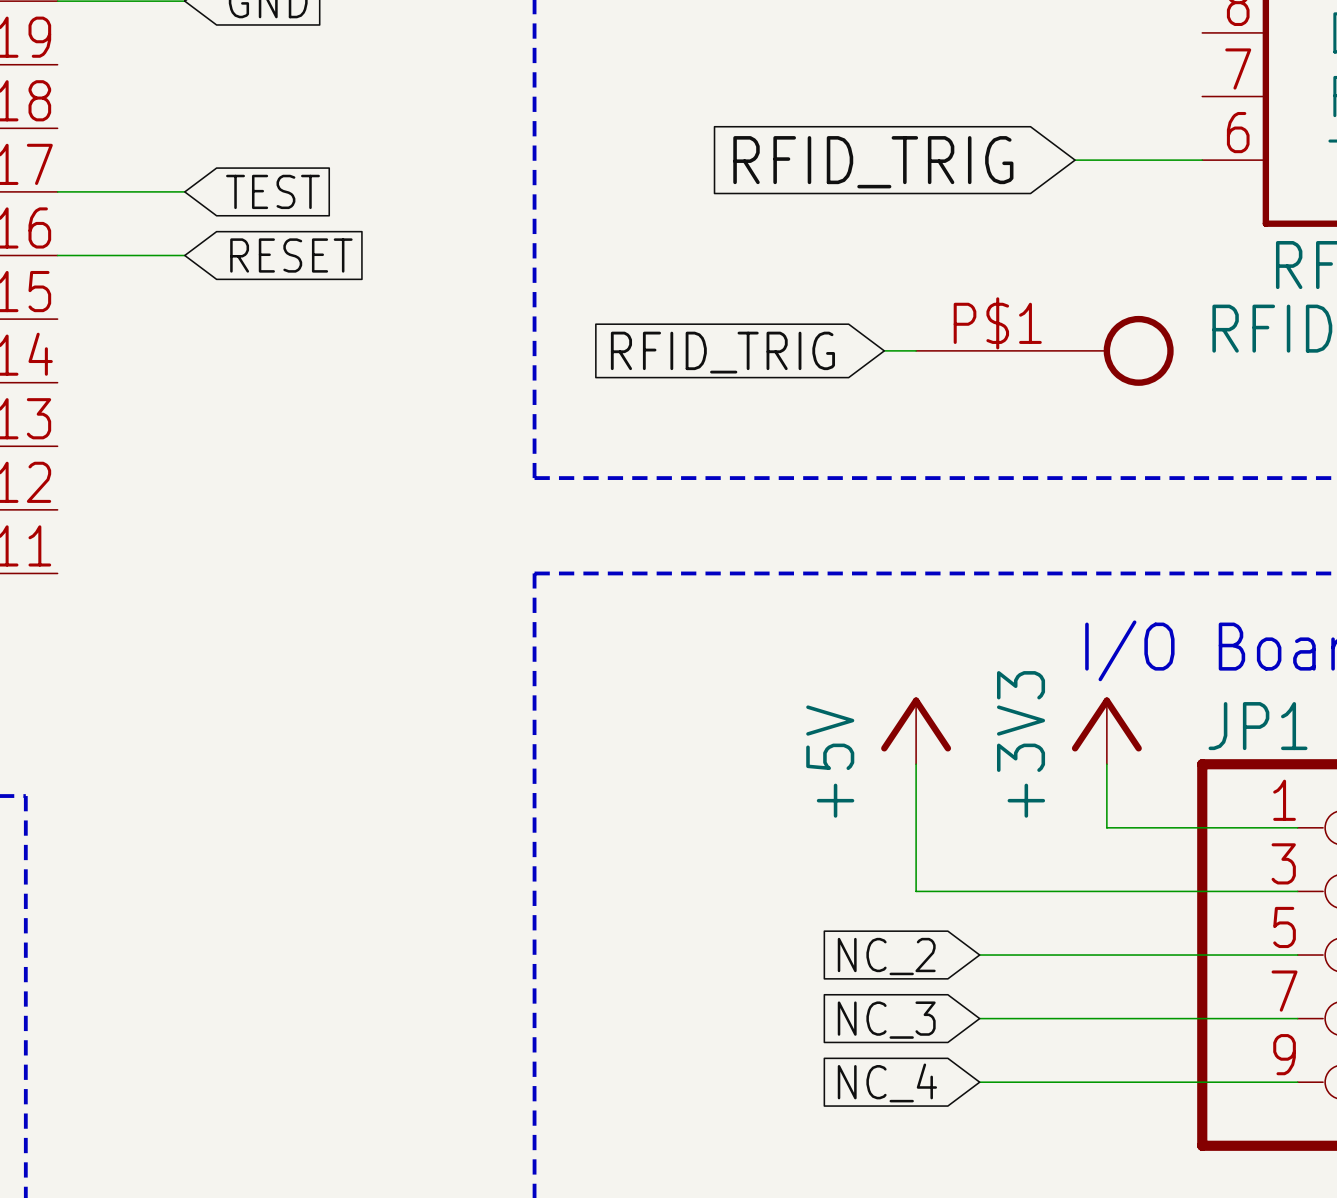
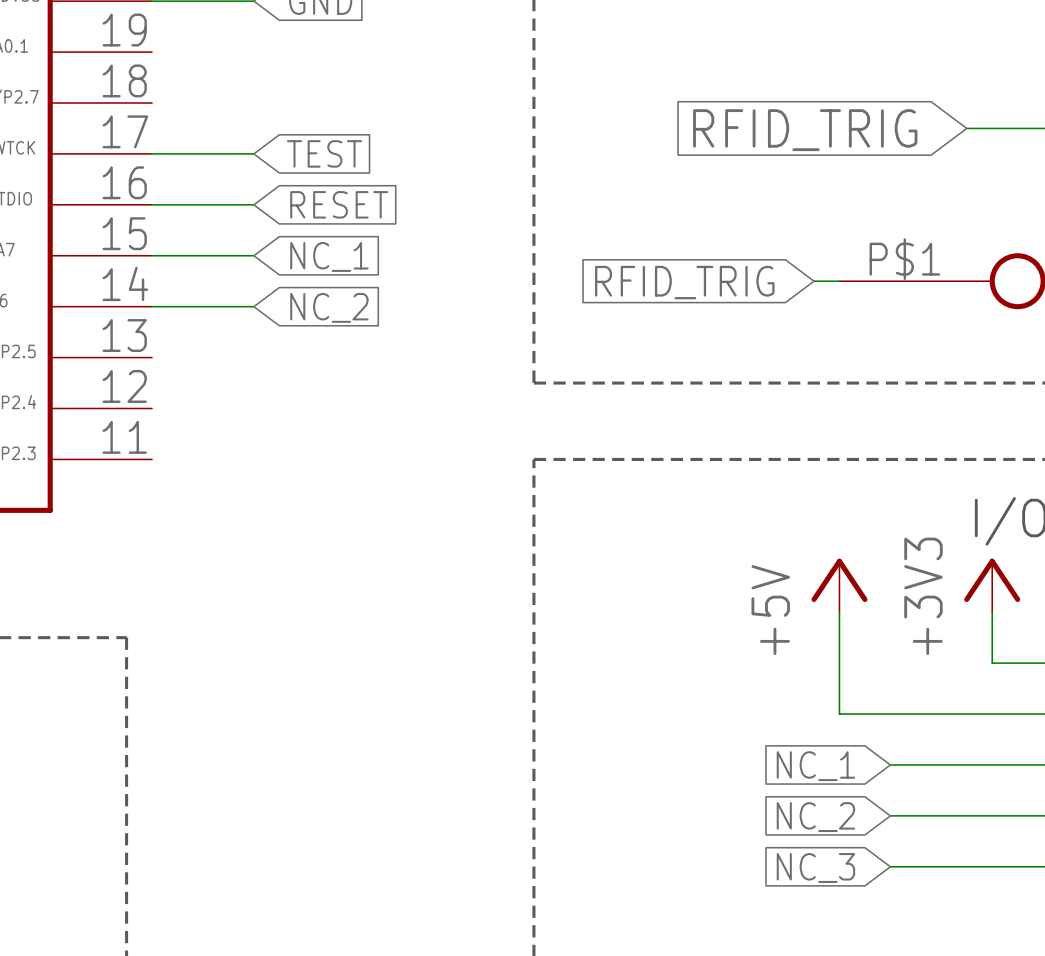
wire: none -> (152, 255) (253, 255)
global label: none -> NC_1 (329, 256)
wire: none -> (152, 306) (253, 306)
global label: none -> NC_2 (329, 307)
global label: NC_2 (886, 956) -> NC_1 (815, 766)
global label: NC_3 (886, 1020) -> NC_2 (815, 817)
global label: NC_4 (887, 1082) -> NC_3 (815, 868)

